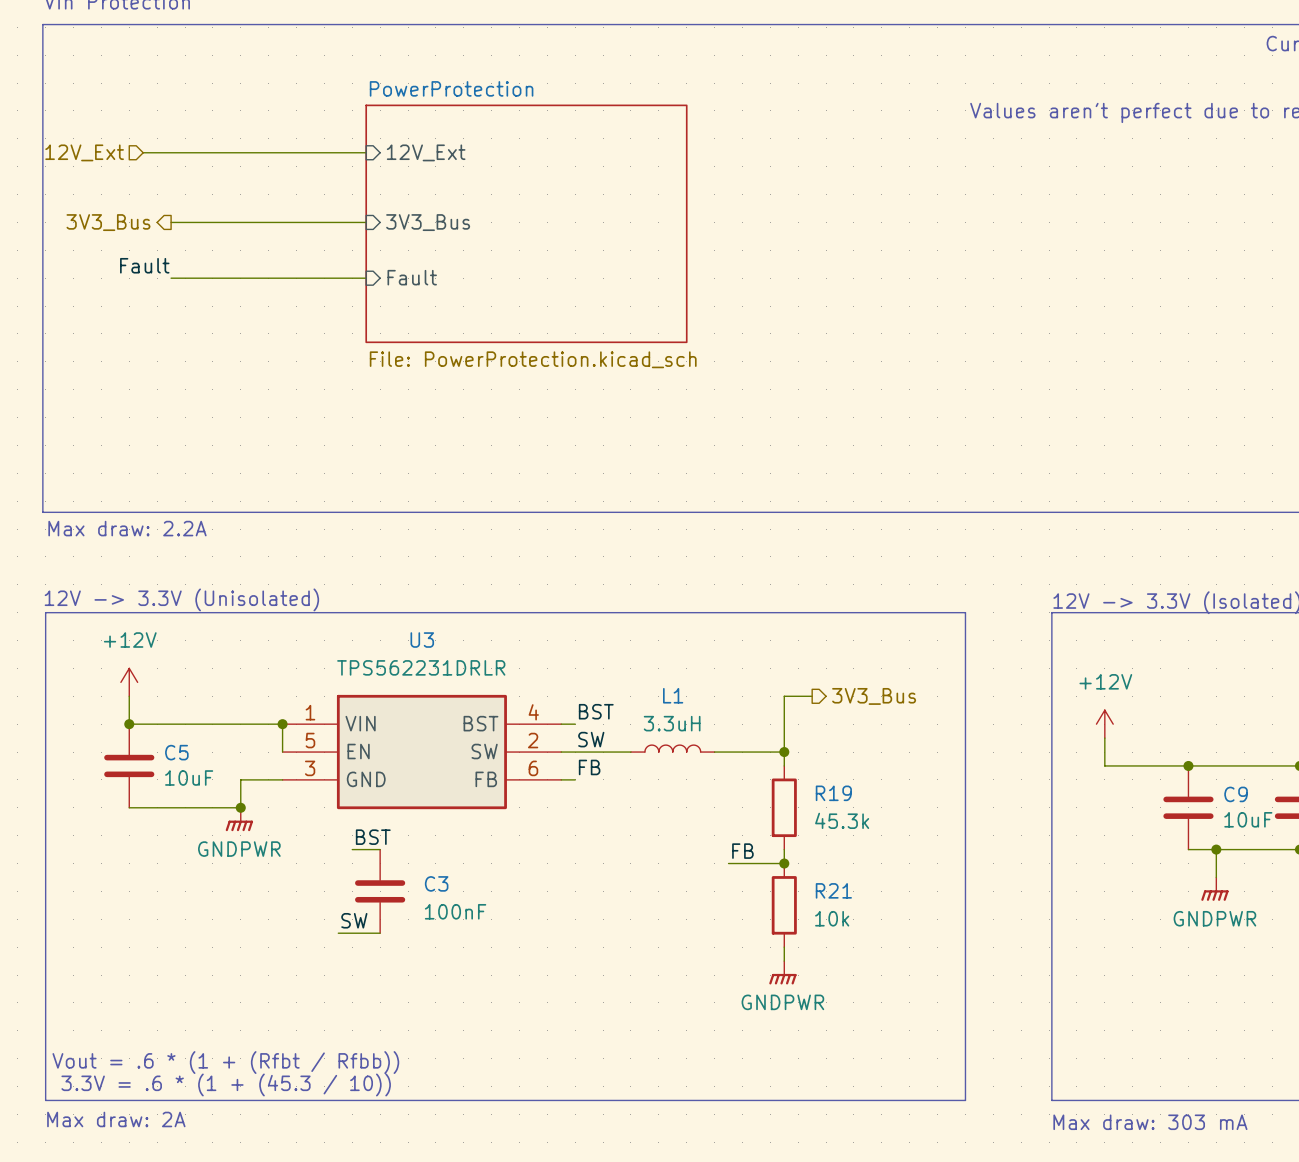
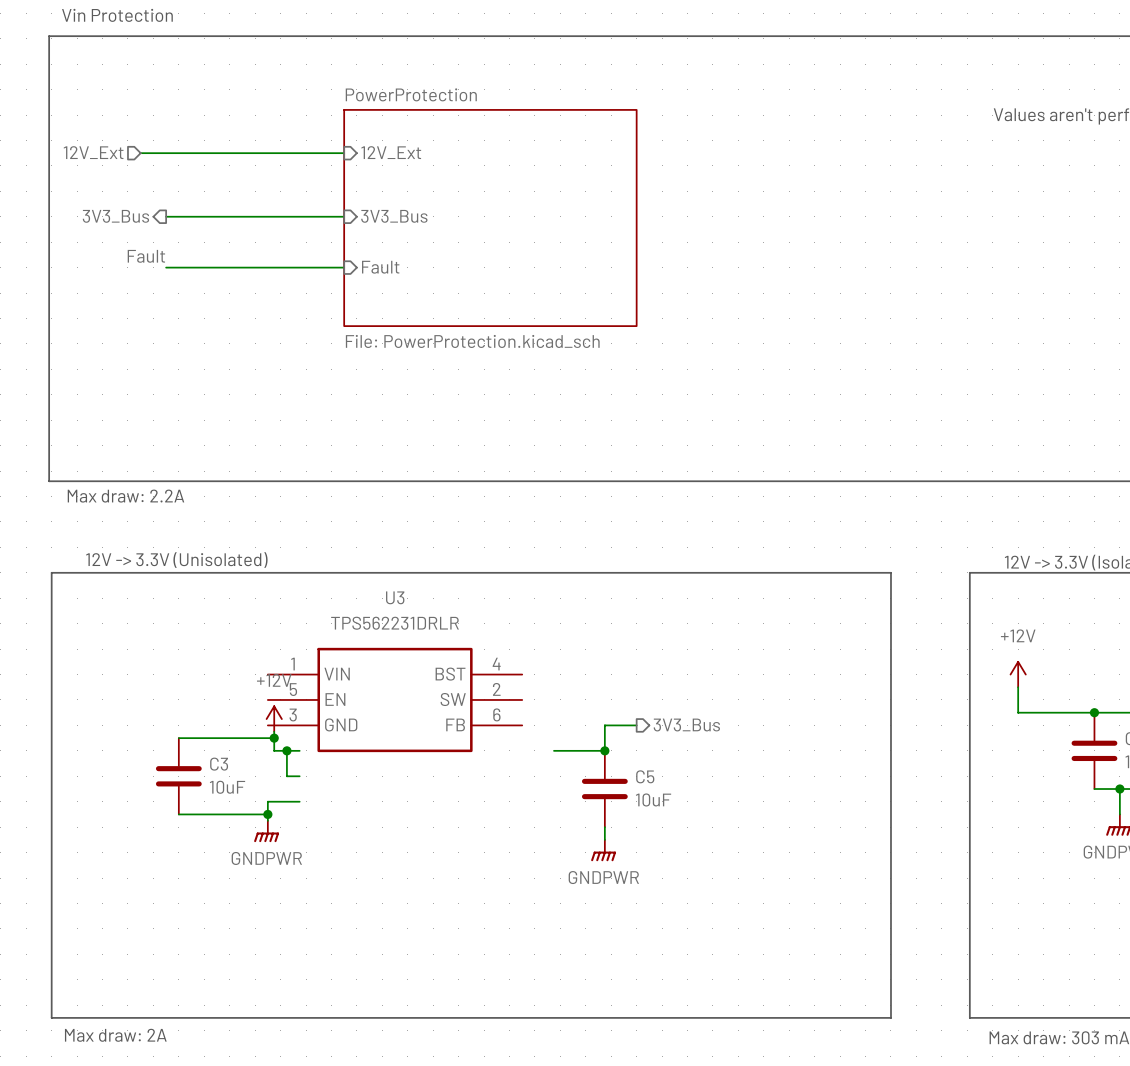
power symbol position: +12V (129, 682) -> +12V (274, 719)
wire: (129, 696) (129, 724) (282, 724) (282, 752) -> none
wire: (812, 696) (784, 696) (784, 765) -> none
hierarchical label position: 3V3_Bus (874, 696) -> 3V3_Bus (686, 725)
label: BST (596, 711) -> none
junction: (129, 724) -> none
junction: (282, 724) -> none
wire: (561, 724) (575, 724) -> none
label: SW (591, 739) -> none
L1: 3.3uH (672, 748) -> none
wire: (561, 752) (630, 752) -> none
wire: (714, 752) (784, 752) -> none
junction: (784, 752) -> none
C5 position: (129, 765) -> (604, 789)
label: FB (589, 767) -> none
wire: (282, 779) (240, 779) (240, 807) (129, 807) -> none
wire: (561, 779) (575, 779) -> none
wire: none -> (636, 725) (604, 725) (604, 750) (553, 750)
wire: none -> (274, 731) (274, 750) (299, 750)
wire: none -> (178, 738) (274, 738)
junction: none -> (274, 738)
junction: (240, 807) -> none
wire: none -> (286, 750) (286, 776) (299, 776)
junction: none -> (286, 750)
junction: none -> (604, 750)
R19: 45.3k (784, 807) -> none
power symbol position: GNDPWR (239, 819) -> GNDPWR (266, 831)
label: BST (373, 837) -> none
wire: (352, 849) (380, 849) -> none
wire: (784, 849) (784, 863) (728, 863) -> none
label: FB (742, 851) -> none
wire: none -> (299, 801) (267, 801) (267, 820)
junction: (784, 863) -> none
wire: none -> (178, 814) (267, 814)
junction: none -> (267, 814)
C3 name position: C3 (436, 883) -> C3 (219, 764)
C3 position: (380, 891) -> (178, 776)
R21: 10k (784, 905) -> none
C3 value: 100nF (455, 911) -> 10uF (227, 787)
label: SW (354, 920) -> none
wire: (338, 933) (380, 933) -> none
wire: (784, 947) (784, 961) -> (604, 827) (604, 839)
power symbol position: GNDPWR (782, 972) -> GNDPWR (603, 850)
text: Vout = .6 * (1 + (Rfbt / Rfbb)) (225, 1062) -> none
text: 3.3V = .6 * (1 + (45.3 / 10)) (226, 1084) -> none

